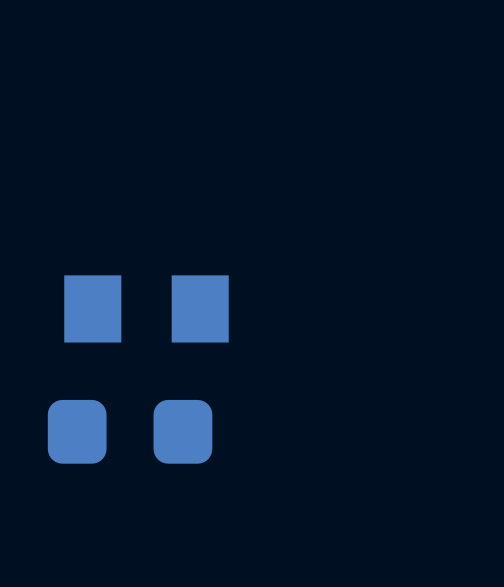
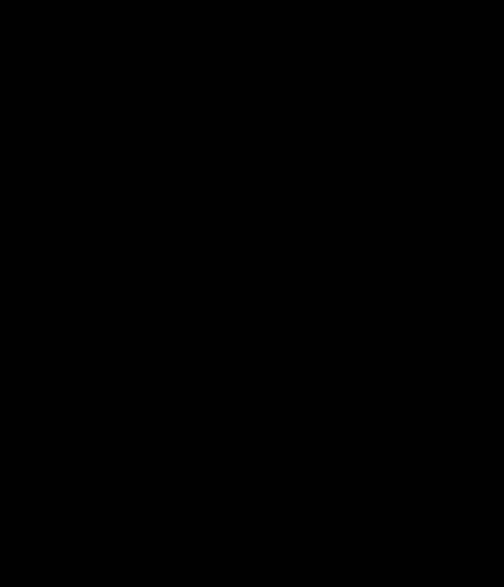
part: (146, 308) -> none
part: (130, 431) -> none

